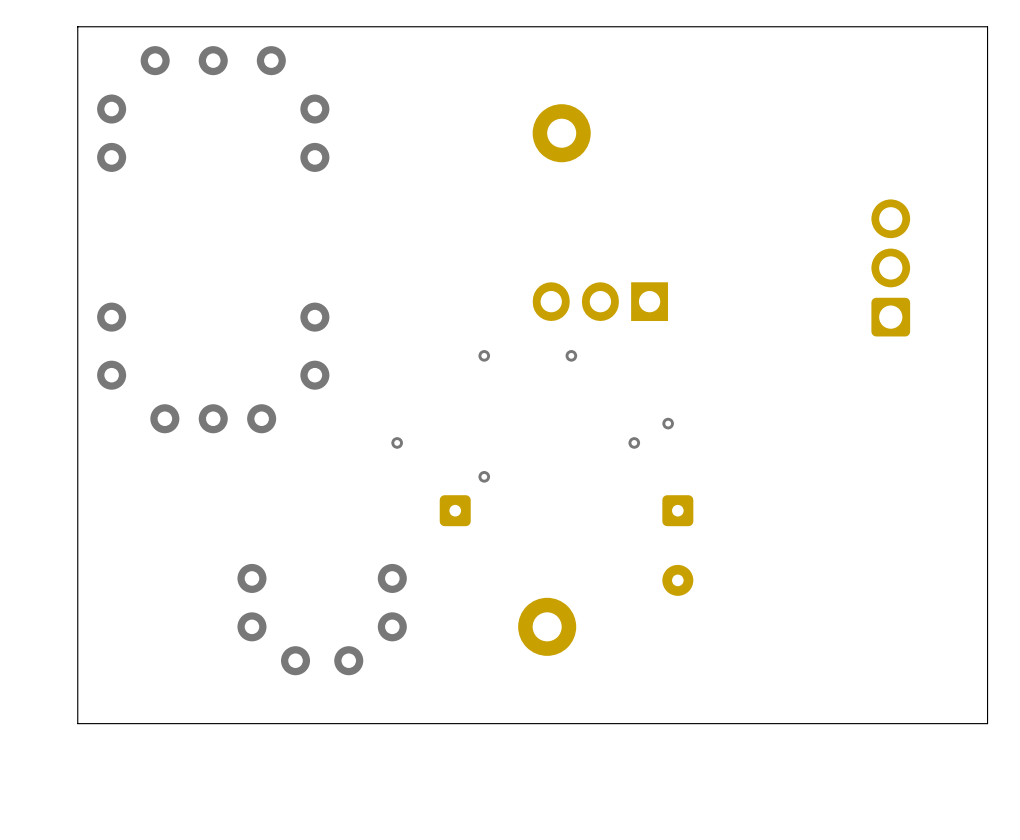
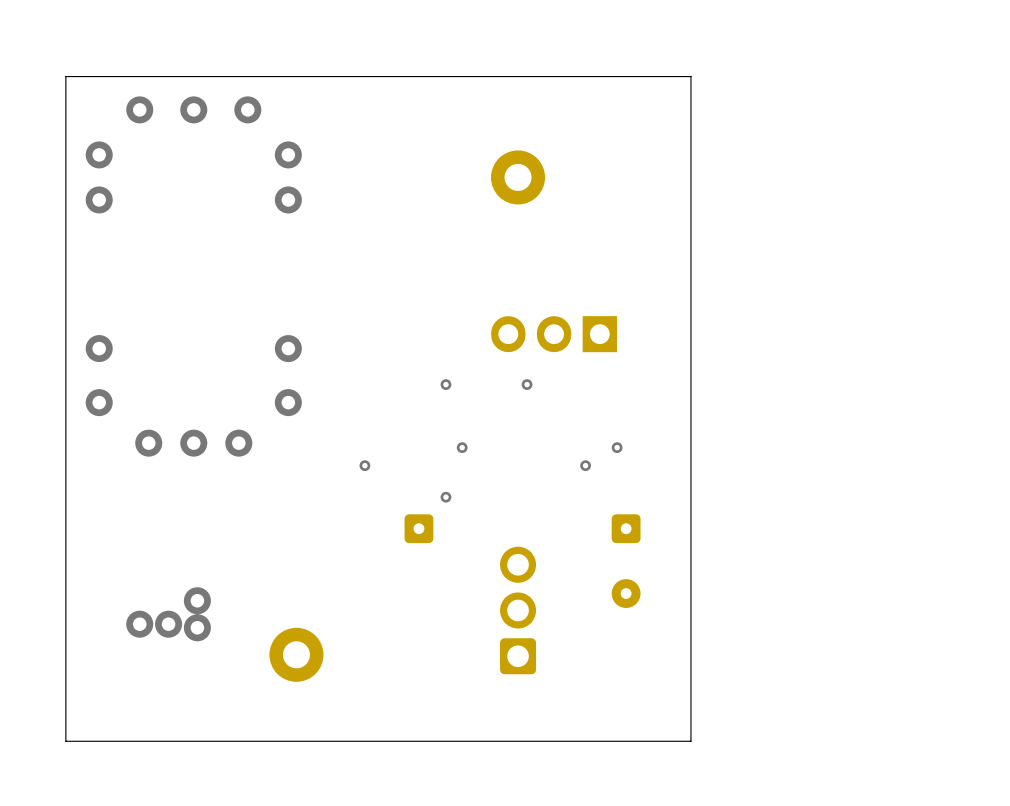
board edge: (987, 26) (77, 26) (77, 723) (987, 723) (987, 26) -> (690, 76) (690, 741) (65, 741) (65, 76) (690, 76)
part position: (890, 267) -> (518, 610)
via: none -> (462, 447)
via: (251, 578) -> none
via: (392, 578) -> none
via: none -> (197, 600)
via: none -> (139, 624)
via: none -> (168, 624)
via: none -> (197, 627)
via: (251, 626) -> none
via: (392, 626) -> none
part position: (547, 626) -> (296, 654)
via: (295, 660) -> none
via: (348, 660) -> none

